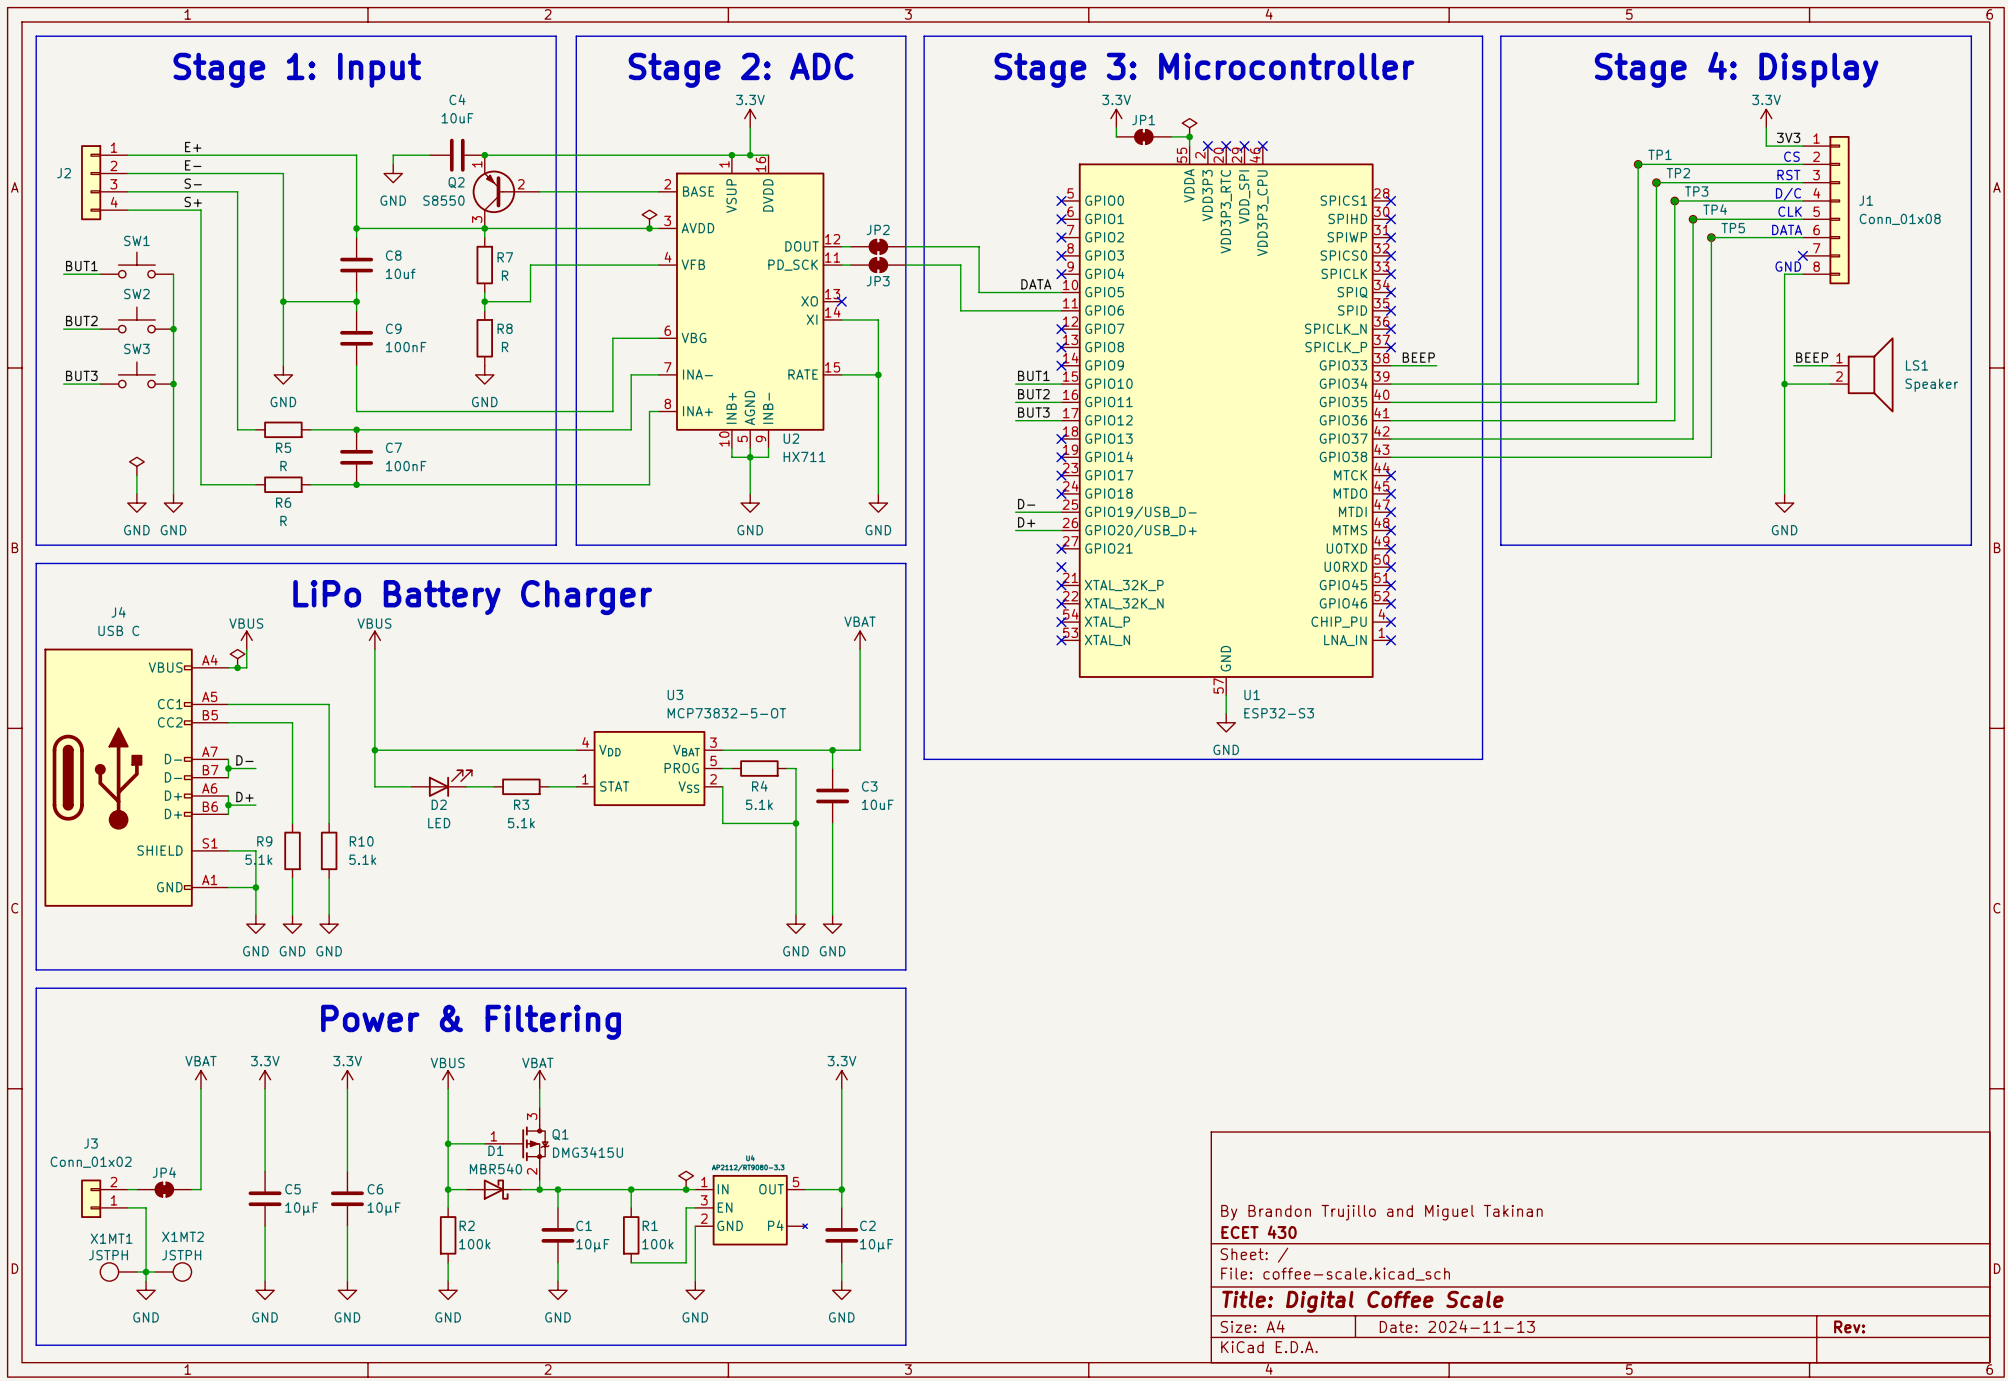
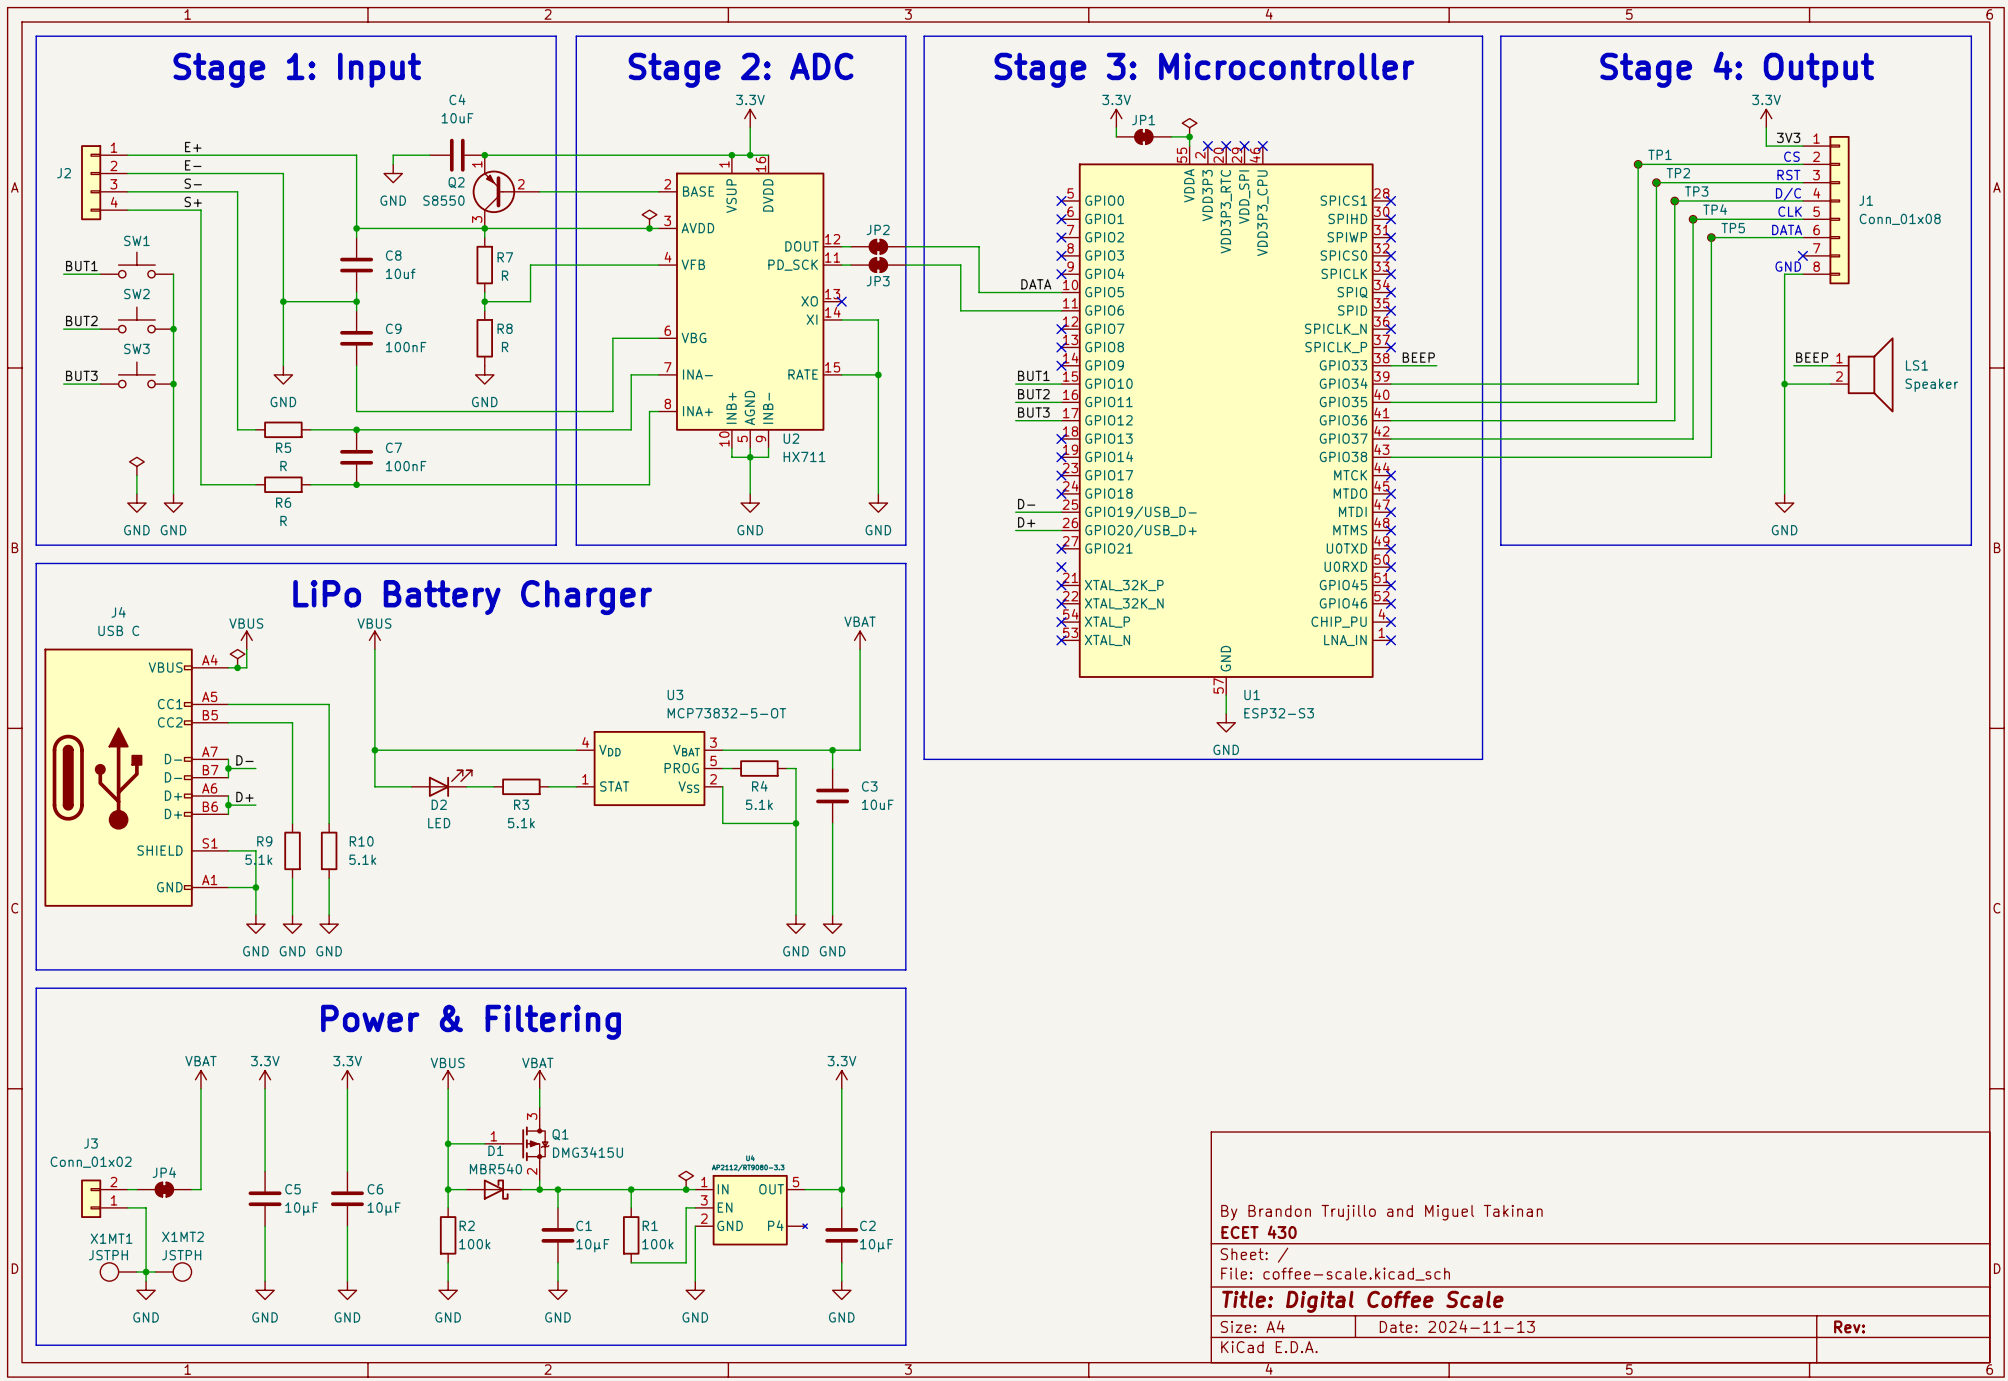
text: Stage 4: Display (1736, 69) -> Stage 4: Output (1737, 69)

